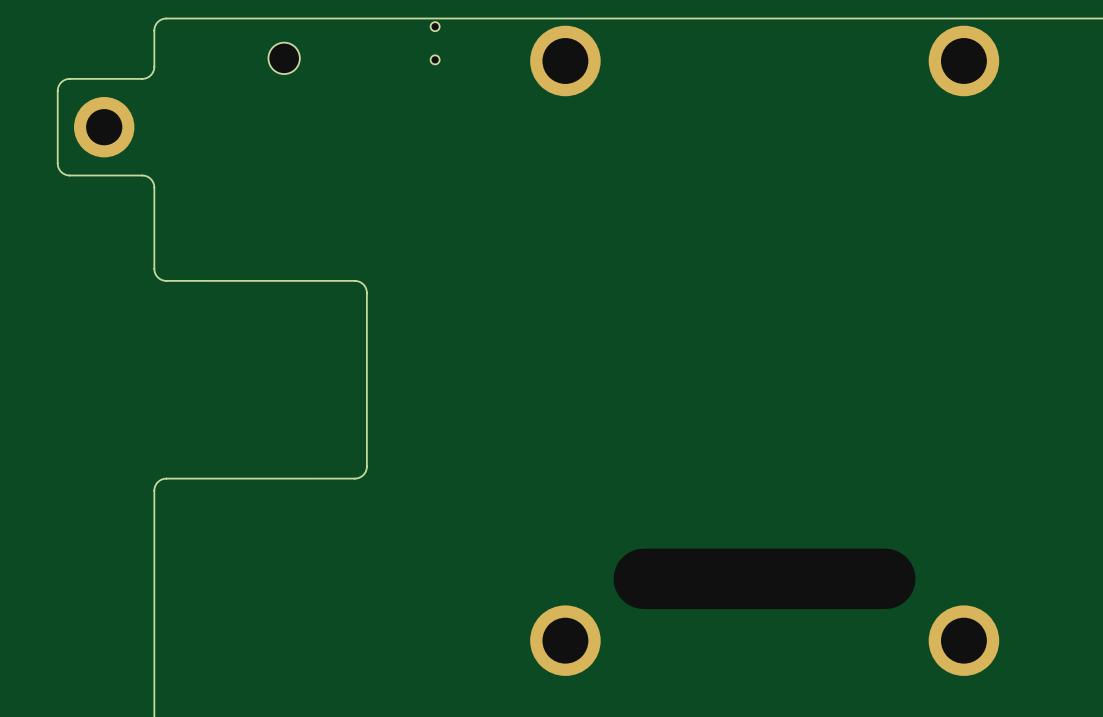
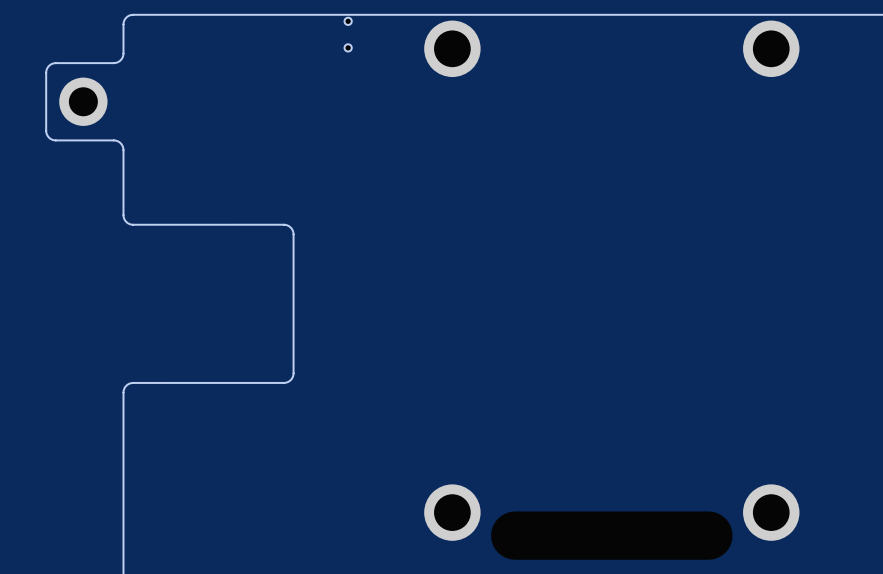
part: (284, 58) -> none
part position: (764, 578) -> (611, 535)

